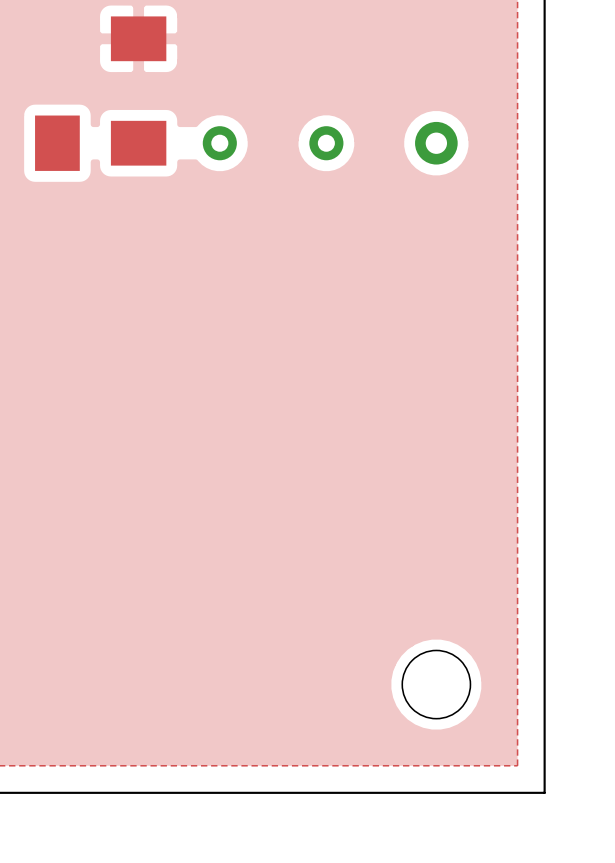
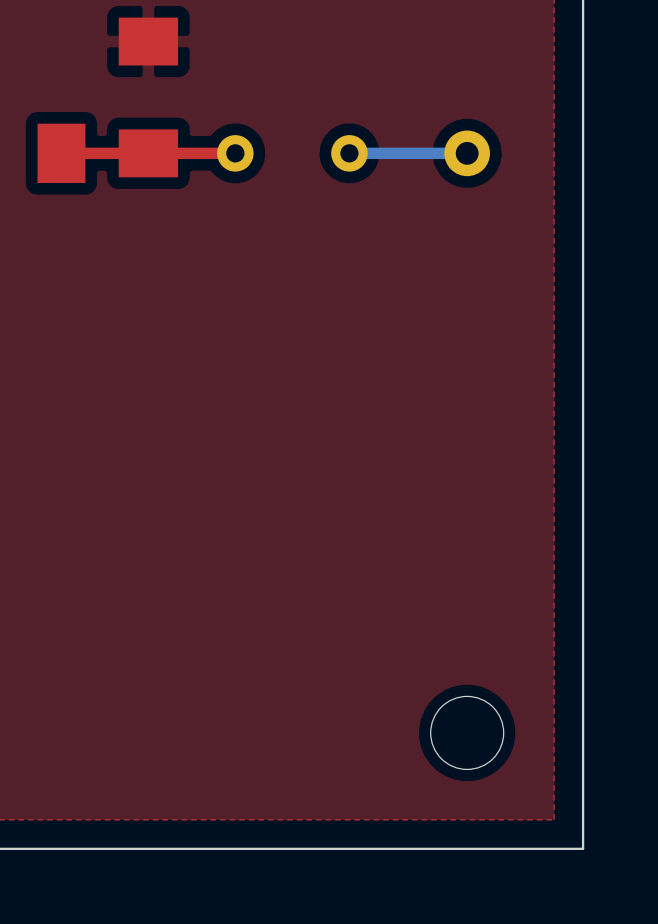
top track: none -> (235, 153) (61, 153)
bottom track: none -> (467, 153) (349, 153)

